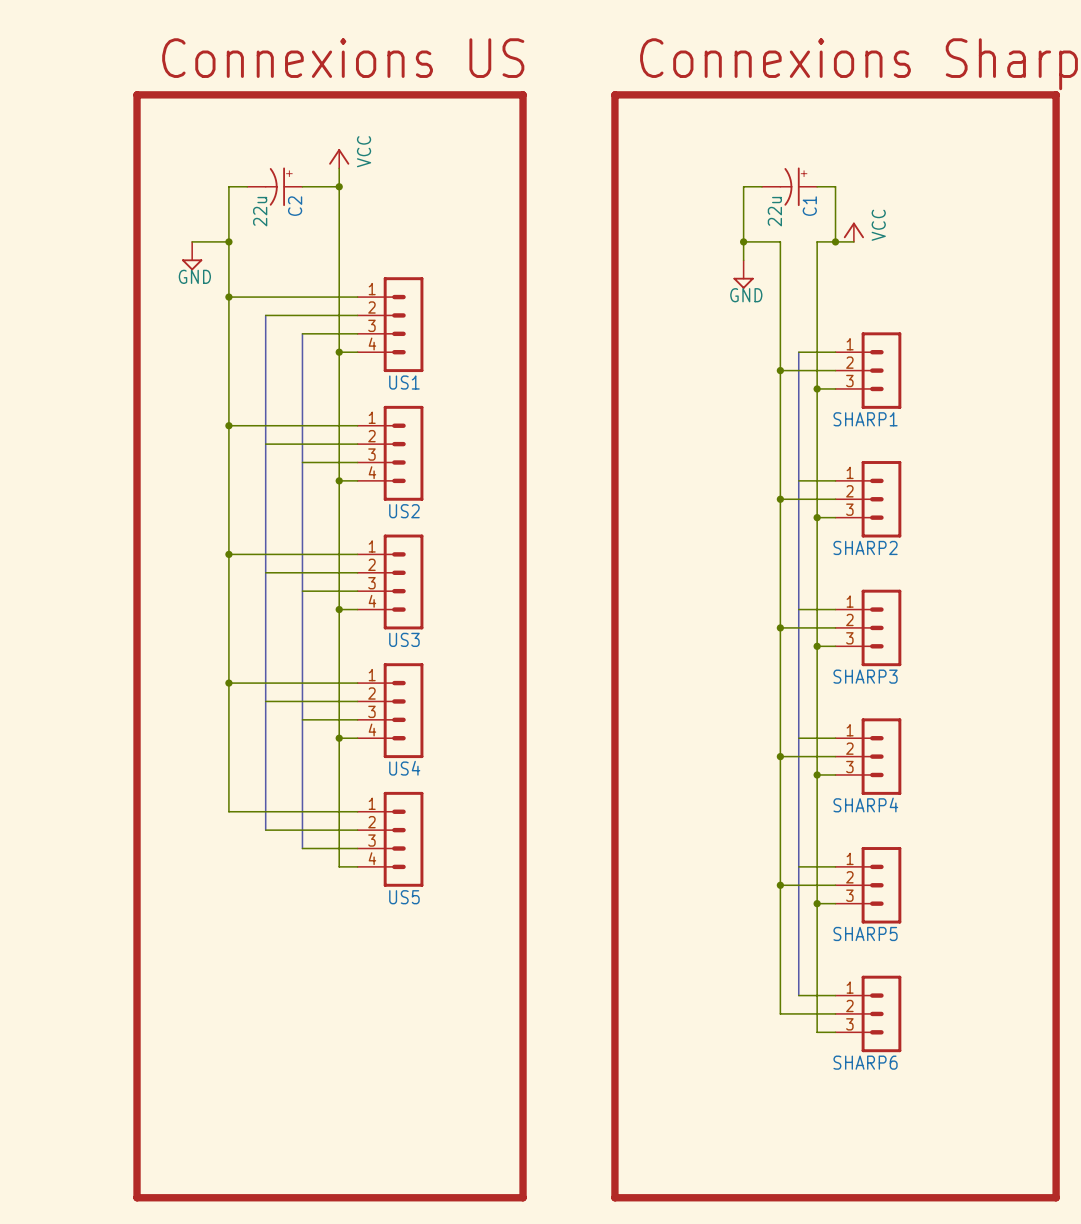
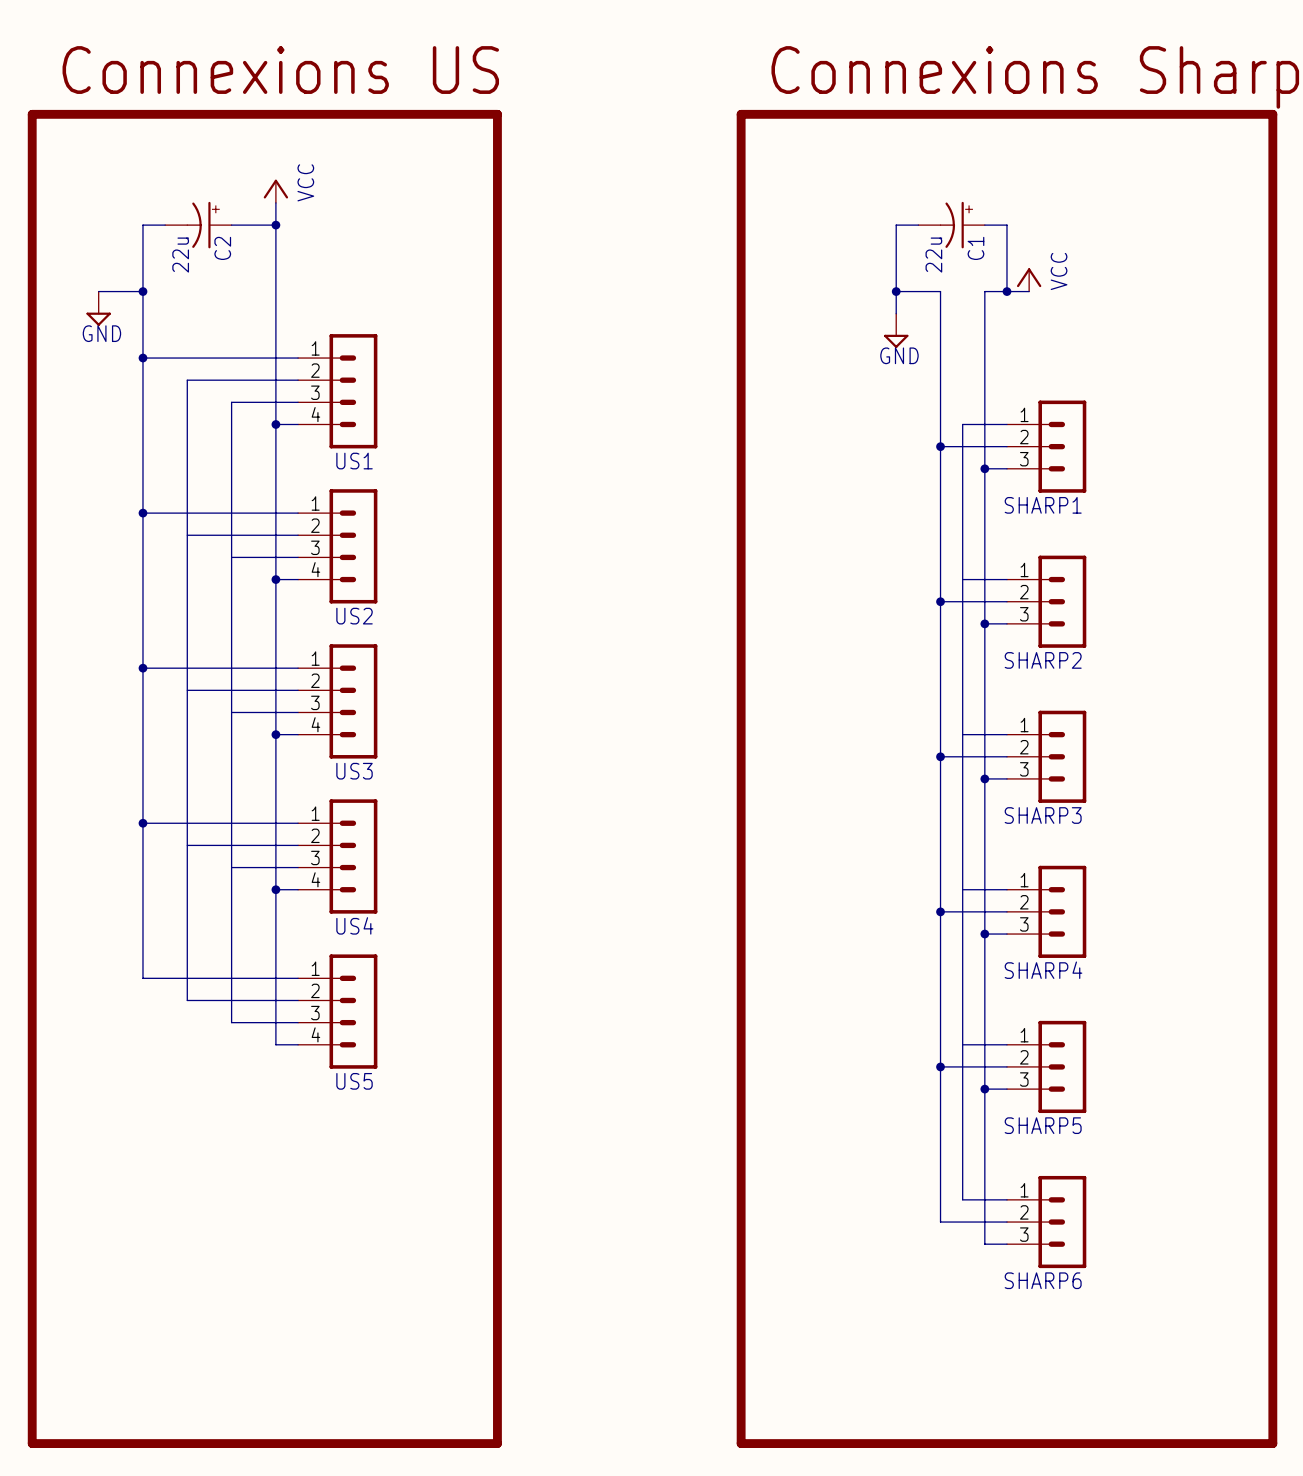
text position: Connexions US (343, 58) -> Connexions US (280, 70)
line: (137, 94) (137, 1197) -> (165, 114) (32, 114) (32, 1443) (165, 1443)
line: (412, 94) (523, 94) (523, 1197) (412, 1197) -> (497, 114) (497, 1443)
power symbol position: VCC (339, 158) -> VCC (275, 191)
wire: none -> (275, 202) (275, 225) (231, 225)
wire: (339, 168) (339, 866) (357, 866) -> none
wire: none -> (165, 225) (142, 225) (142, 978) (275, 978) (275, 1044) (298, 1044)
wire: (228, 186) (247, 186) -> none
junction: none -> (275, 225)
C2 position: (274, 186) -> (198, 225)
wire: (302, 186) (339, 186) -> none
junction: (339, 186) -> none
junction: none -> (142, 291)
wire: (192, 241) (228, 241) -> (98, 291) (142, 291)
junction: (228, 241) -> none
power symbol position: GND (192, 256) -> GND (98, 308)
junction: none -> (142, 358)
junction: (228, 297) -> none
wire: (247, 297) (357, 297) -> (142, 358) (275, 358)
bus: (265, 315) (265, 830) -> (187, 380) (187, 1000)
wire: (265, 315) (357, 315) -> (187, 380) (298, 380)
US1 position: (390, 324) -> (337, 391)
bus: (302, 333) (302, 848) -> (231, 402) (231, 1022)
wire: (302, 333) (357, 333) -> (231, 402) (298, 402)
junction: none -> (275, 424)
wire: (339, 352) (357, 352) -> (275, 424) (298, 424)
junction: (339, 352) -> none
junction: none -> (142, 513)
junction: (228, 425) -> none
wire: (247, 425) (357, 425) -> (142, 513) (275, 513)
wire: (265, 444) (357, 444) -> (187, 535) (298, 535)
US2 position: (390, 453) -> (337, 546)
wire: (302, 462) (357, 462) -> (231, 557) (298, 557)
junction: none -> (275, 579)
wire: (339, 480) (357, 480) -> (275, 579) (298, 579)
junction: (339, 480) -> none
junction: none -> (142, 668)
junction: (228, 554) -> none
wire: (247, 554) (357, 554) -> (142, 668) (275, 668)
wire: (265, 572) (357, 572) -> (187, 690) (298, 690)
US3 position: (390, 581) -> (337, 701)
wire: (302, 591) (357, 591) -> (231, 712) (298, 712)
junction: none -> (275, 734)
wire: (339, 609) (357, 609) -> (275, 734) (298, 734)
junction: (339, 609) -> none
junction: none -> (142, 823)
junction: (228, 683) -> none
wire: (247, 683) (357, 683) -> (142, 823) (275, 823)
wire: (265, 701) (357, 701) -> (187, 845) (298, 845)
US4 position: (390, 710) -> (337, 856)
wire: (302, 719) (357, 719) -> (231, 867) (298, 867)
junction: none -> (275, 889)
wire: (339, 738) (357, 738) -> (275, 889) (298, 889)
junction: (339, 738) -> none
wire: (247, 811) (357, 811) -> none
wire: (265, 830) (357, 830) -> (187, 1000) (298, 1000)
US5 position: (390, 839) -> (337, 1011)
wire: (302, 848) (357, 848) -> (231, 1022) (298, 1022)

